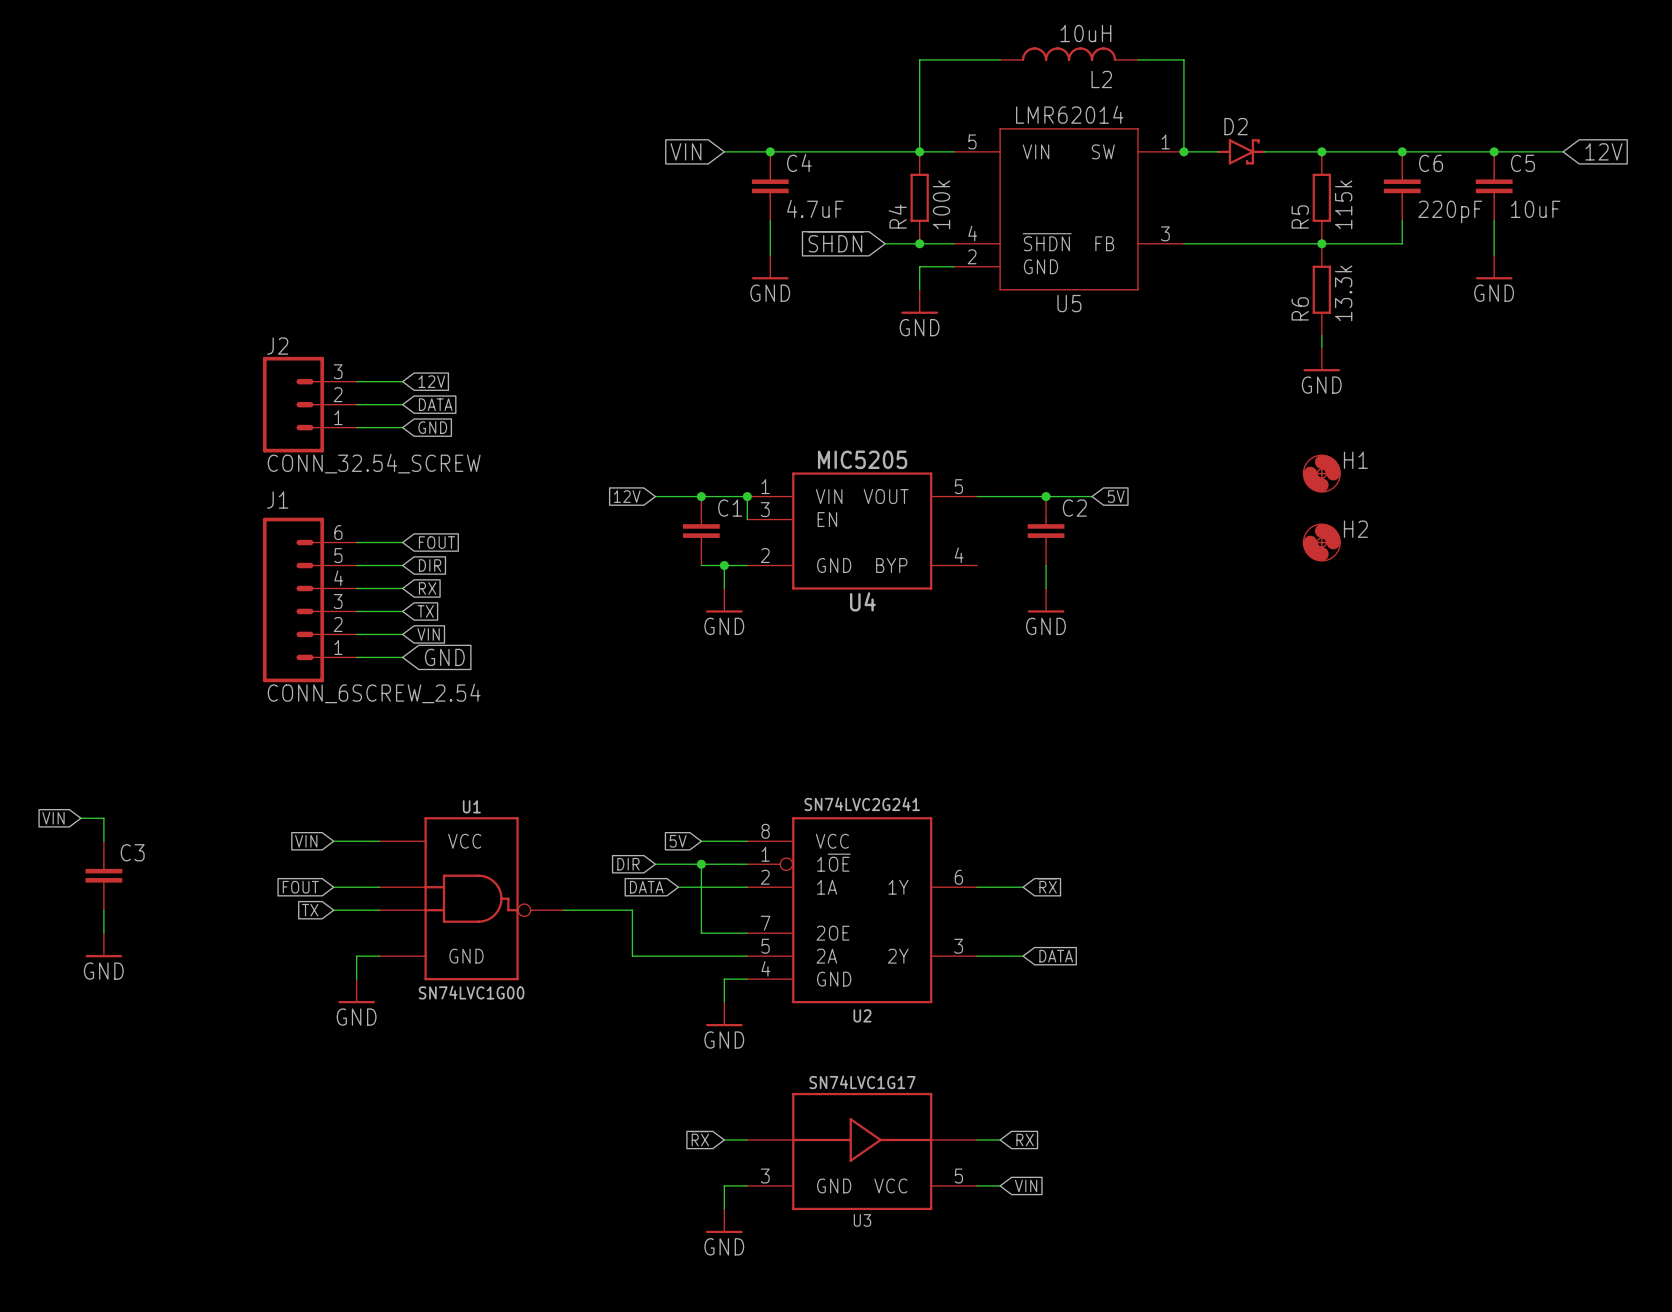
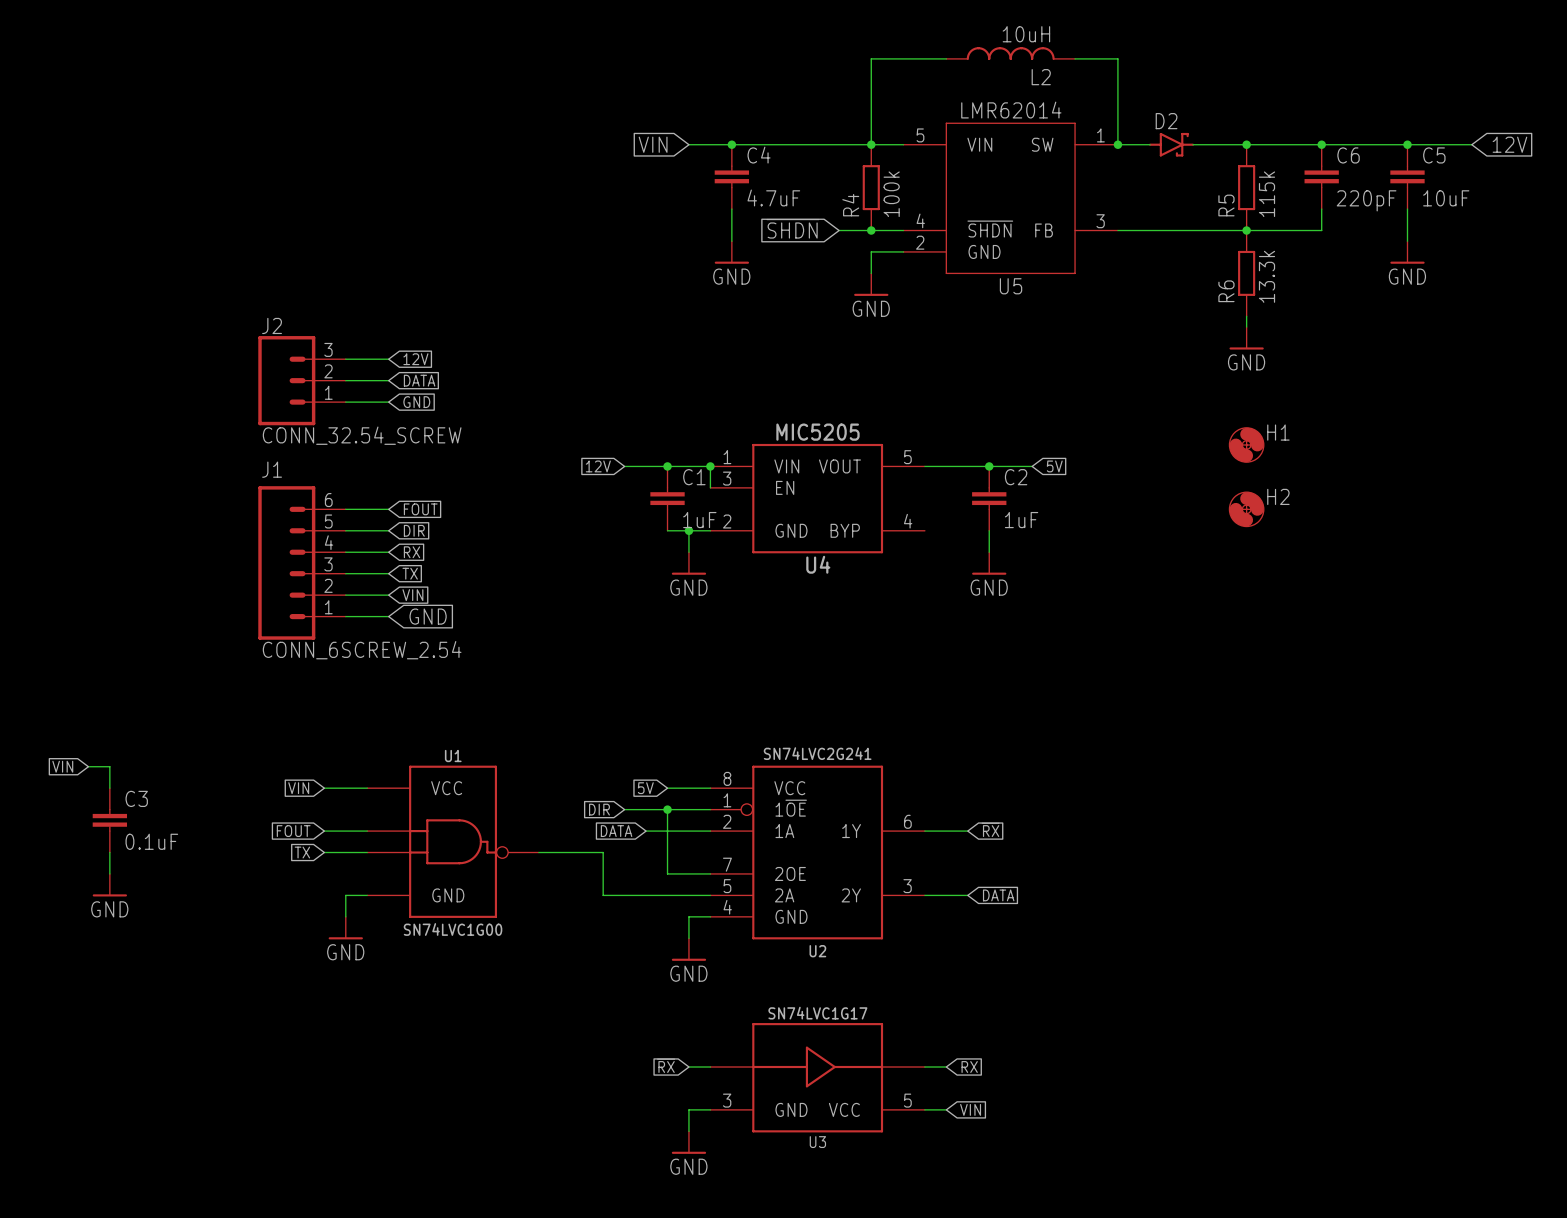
C1 value: none -> 1uF (699, 520)
C2 value: none -> 1uF (1021, 520)
C3 value: none -> 0.1uF (151, 841)

